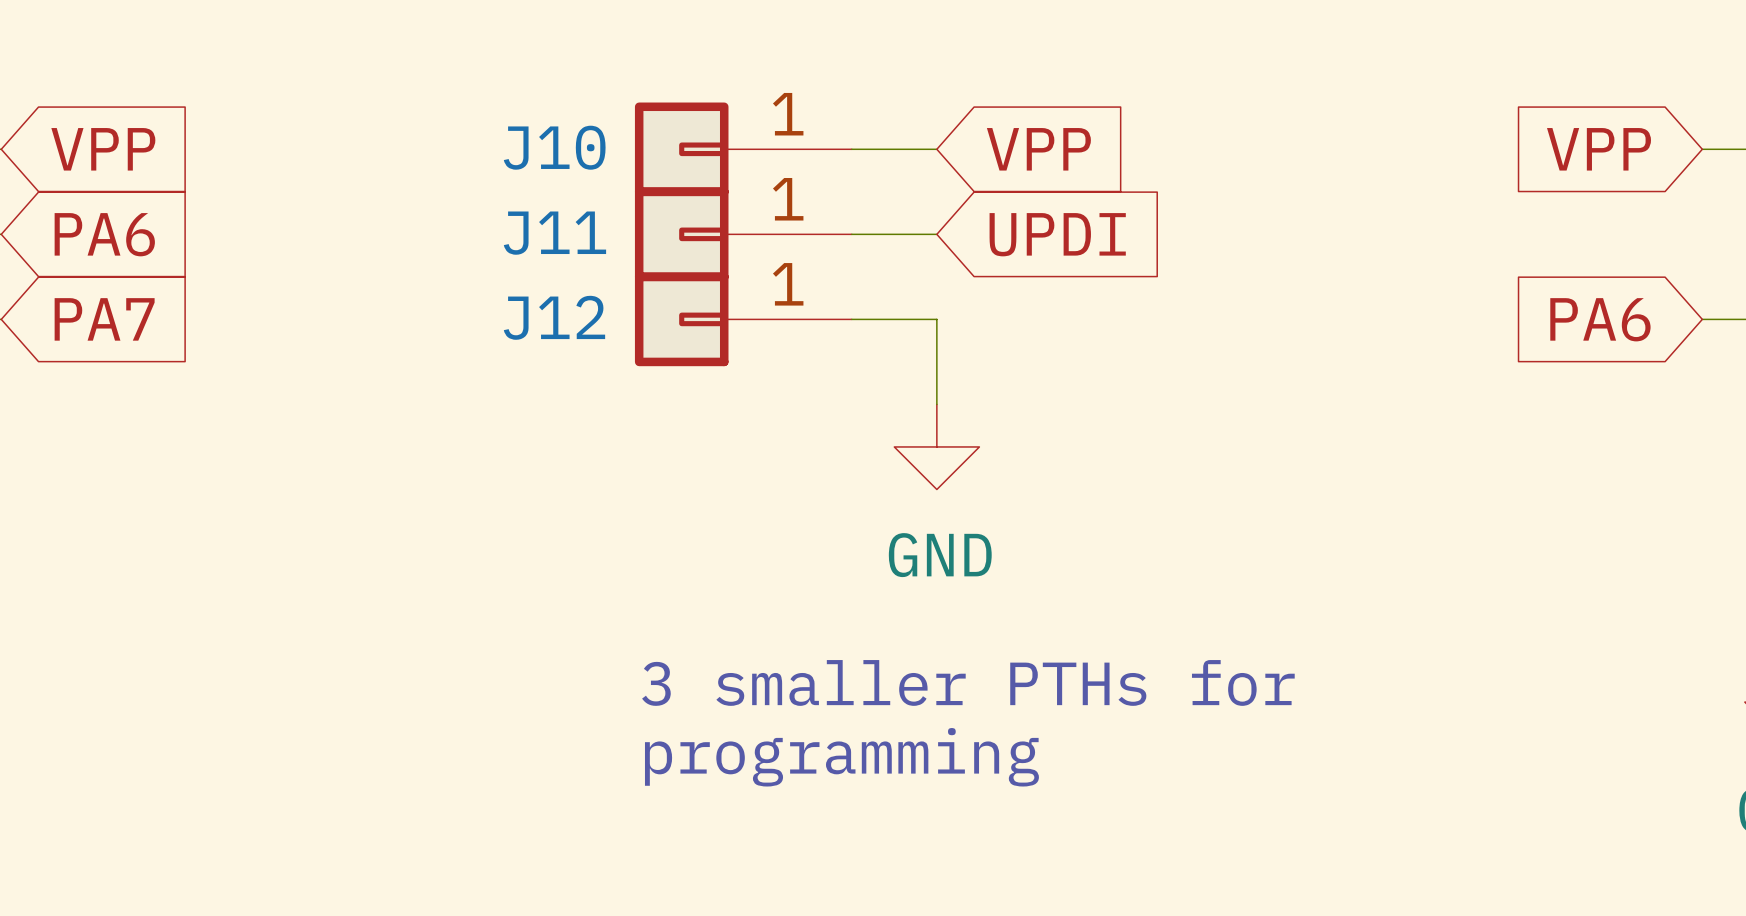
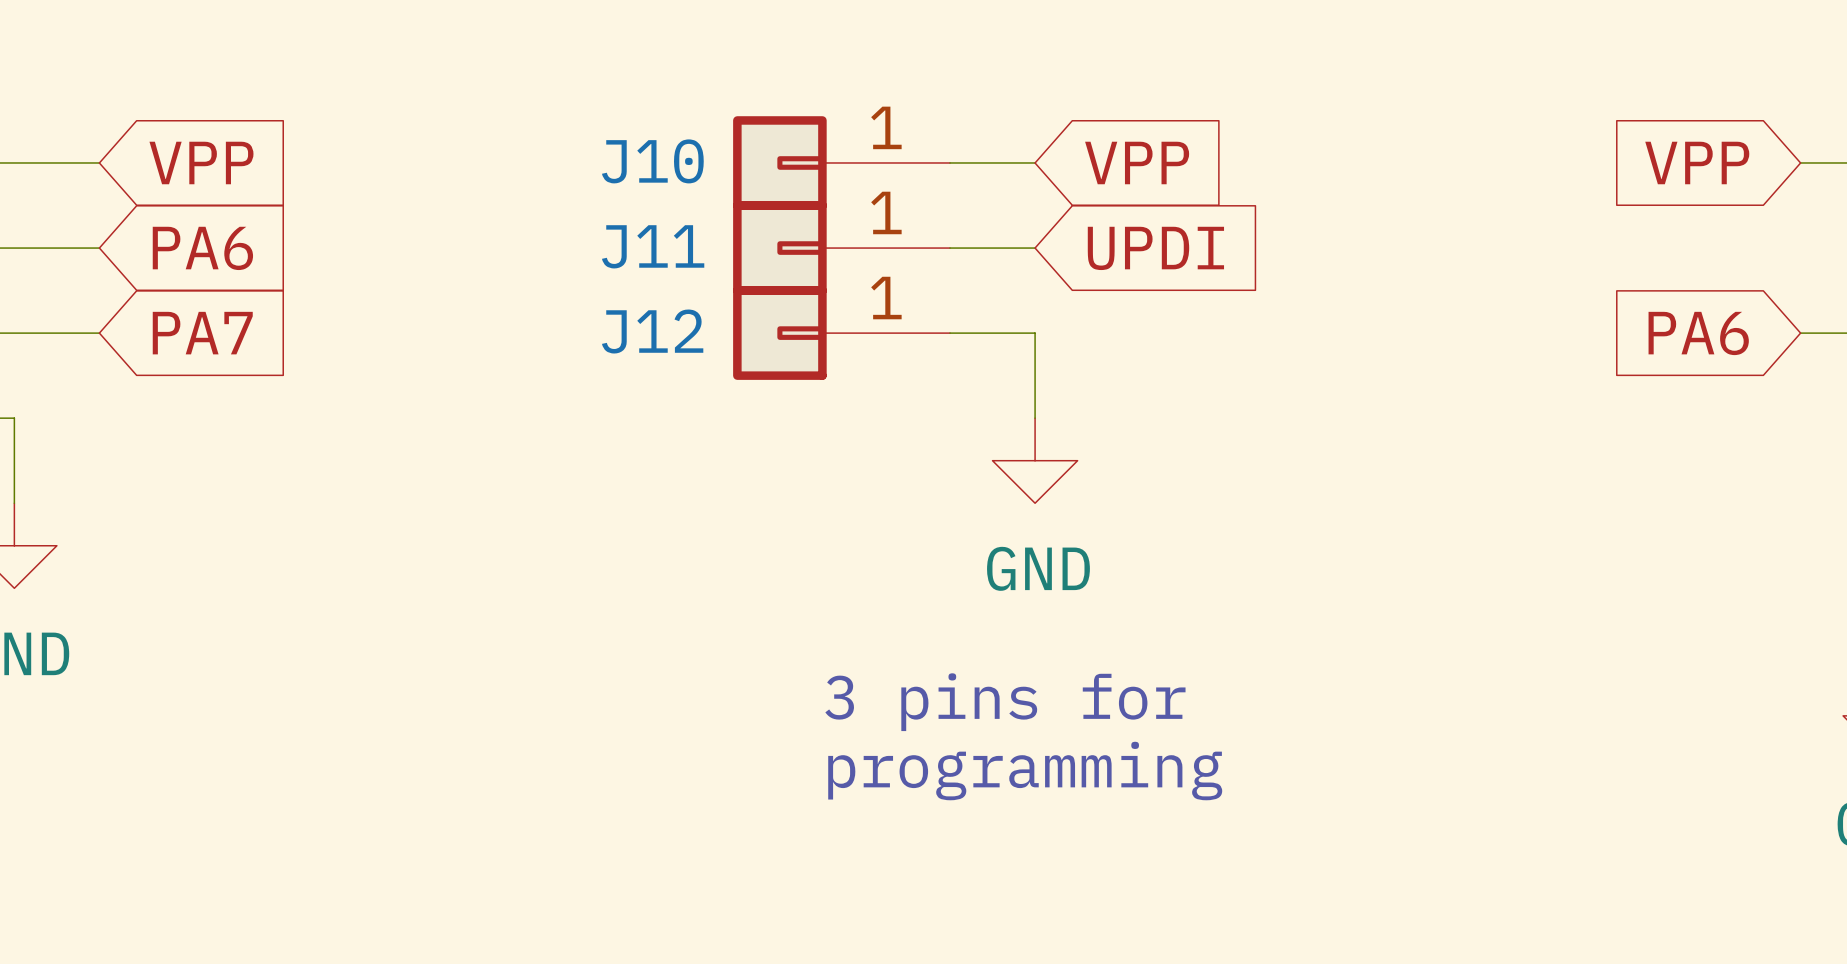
text: 3 smaller PTHs for (968, 682) -> none
text: none -> 3 pins for (1005, 702)
text position: programming (841, 757) -> programming (1025, 771)

